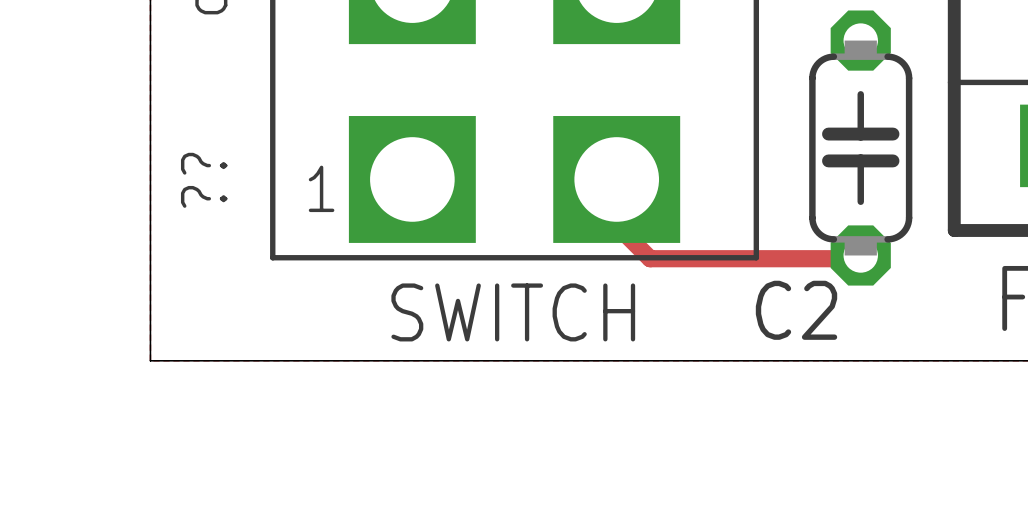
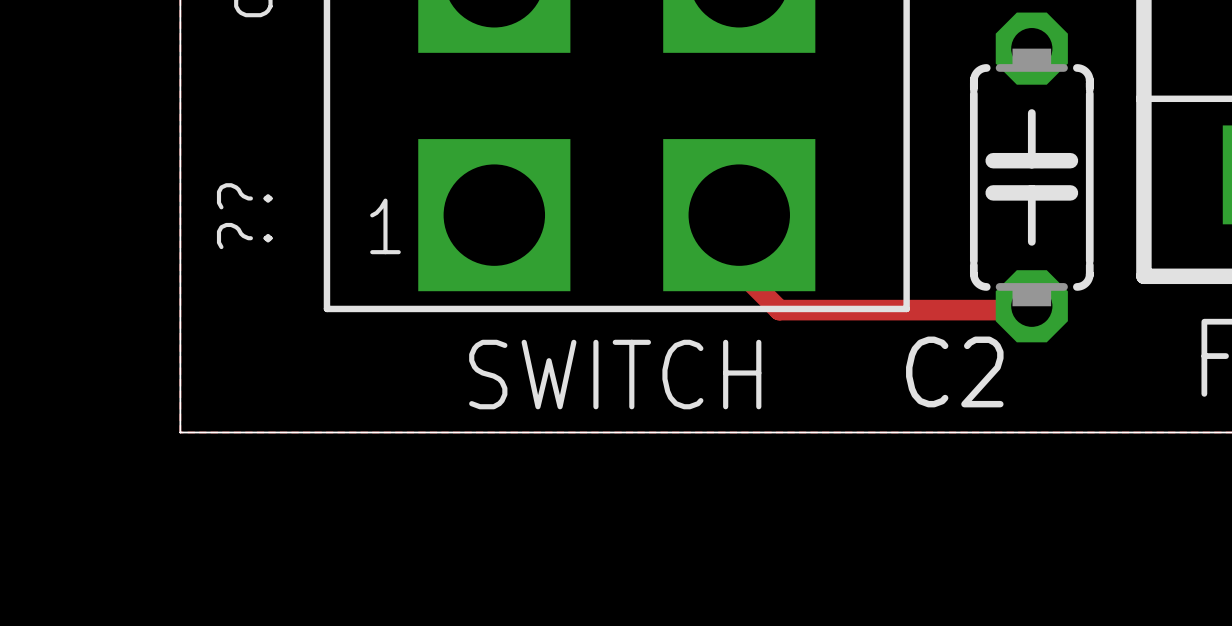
C2 footprint: [809, 10, 913, 286] -> [969, 12, 1094, 343]

